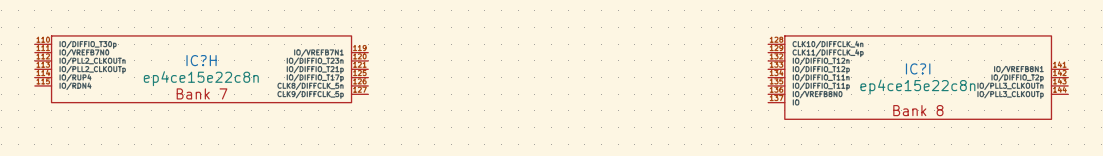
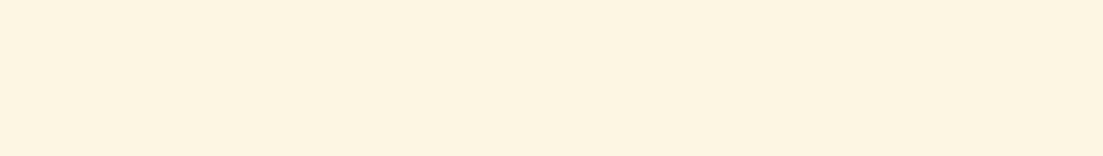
IC?H: ep4ce15e22c8n (201, 69) -> none
IC?I: ep4ce15e22c8n (918, 77) -> none

